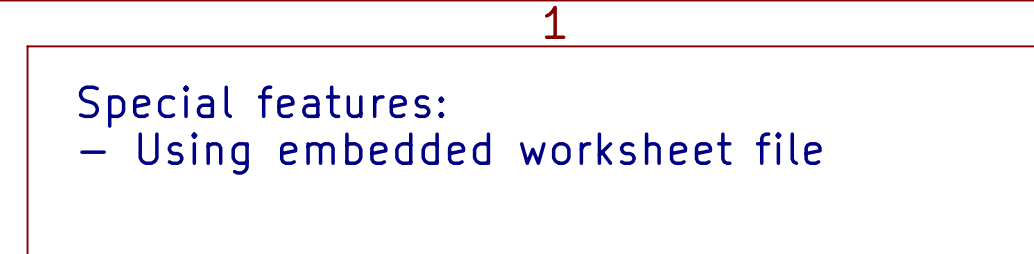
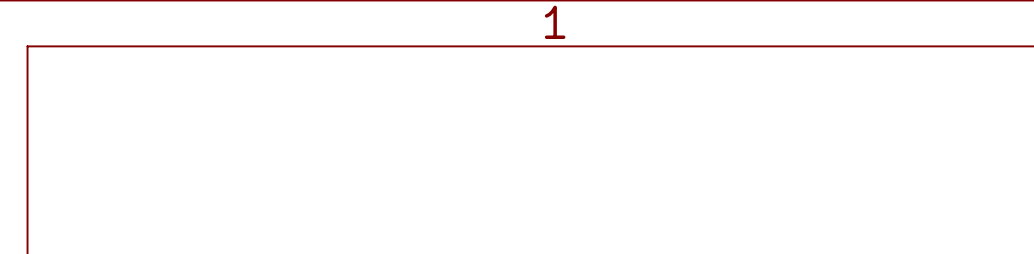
text: Special features: (261, 106) -> none
text: - Using embedded worksheet file (450, 153) -> none

